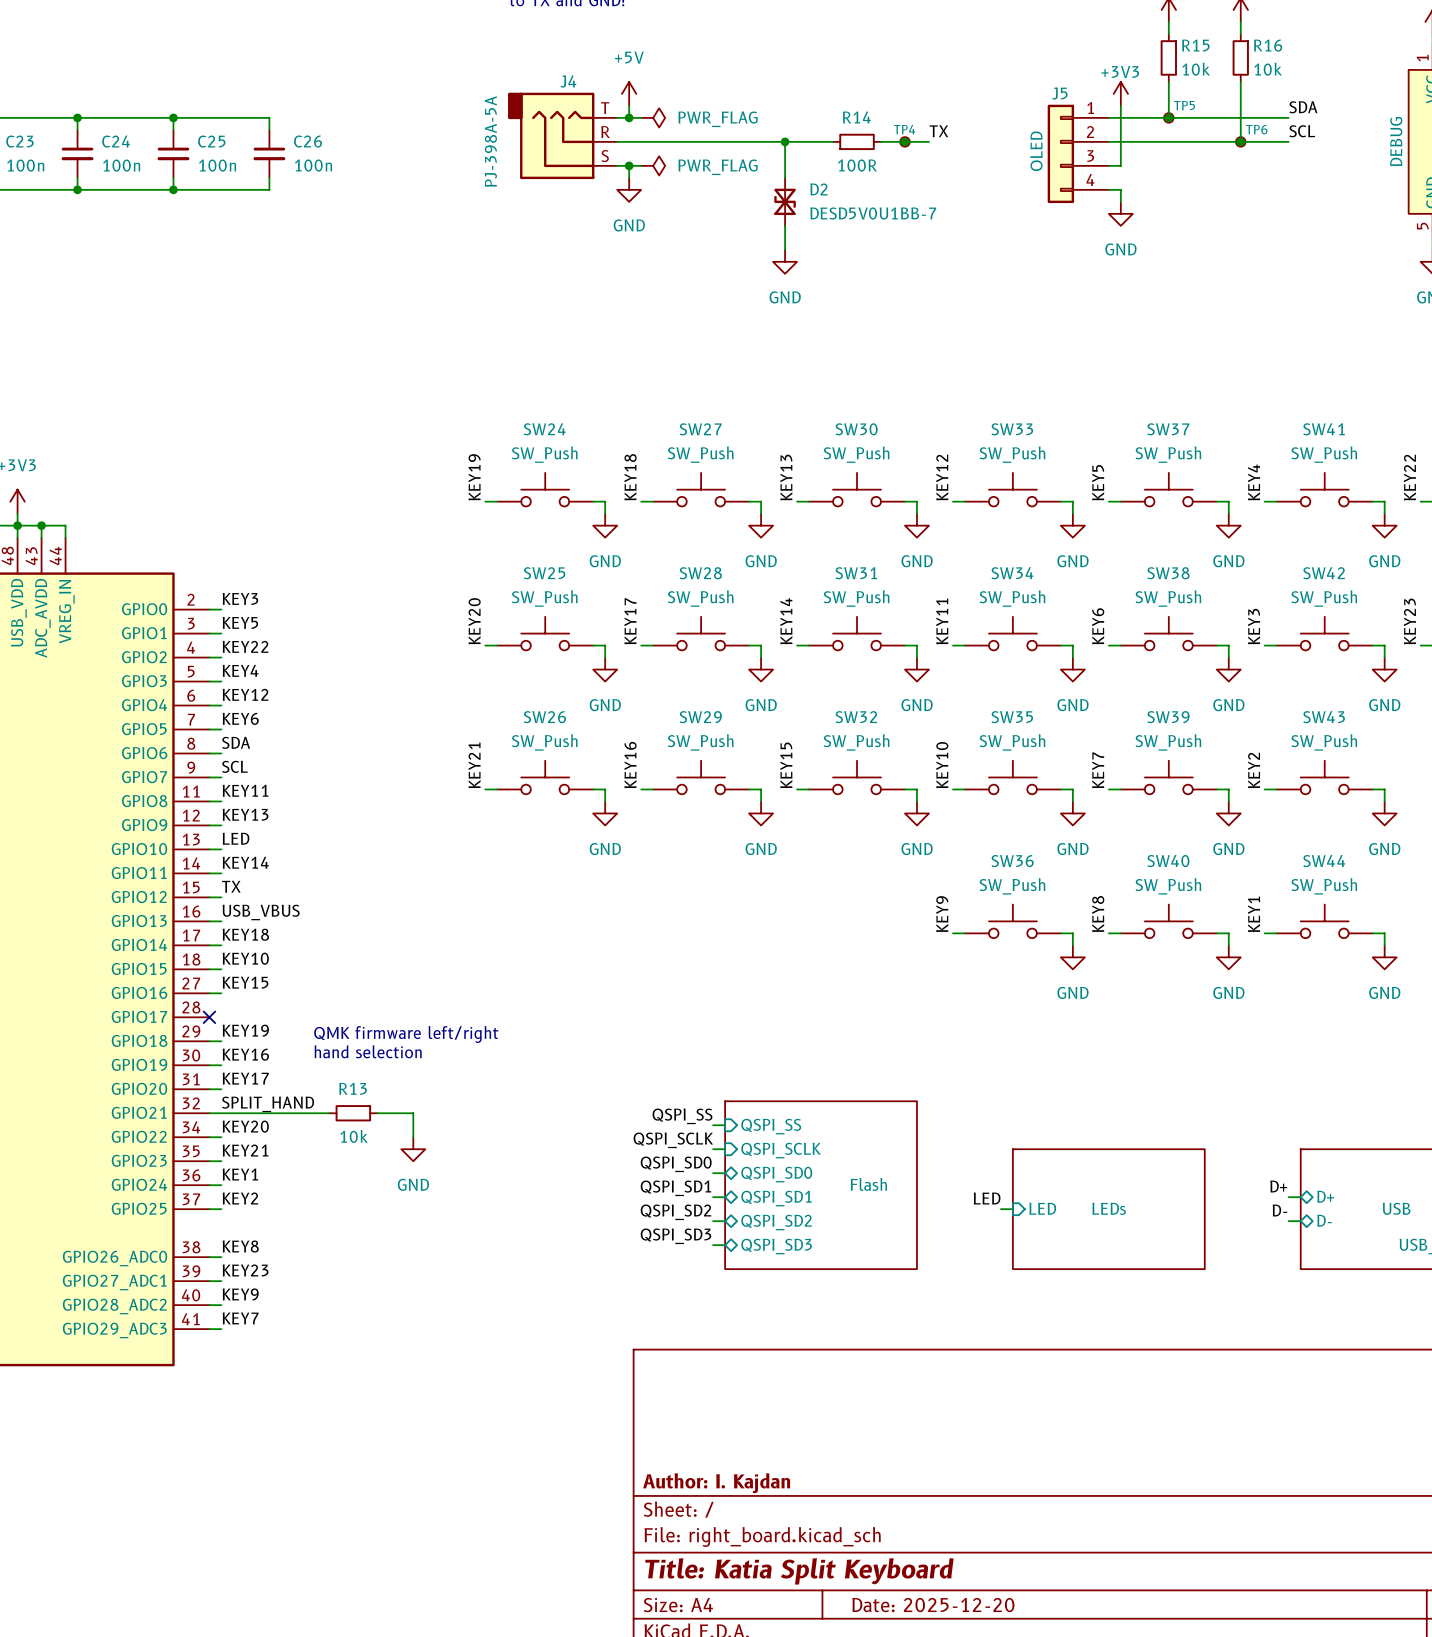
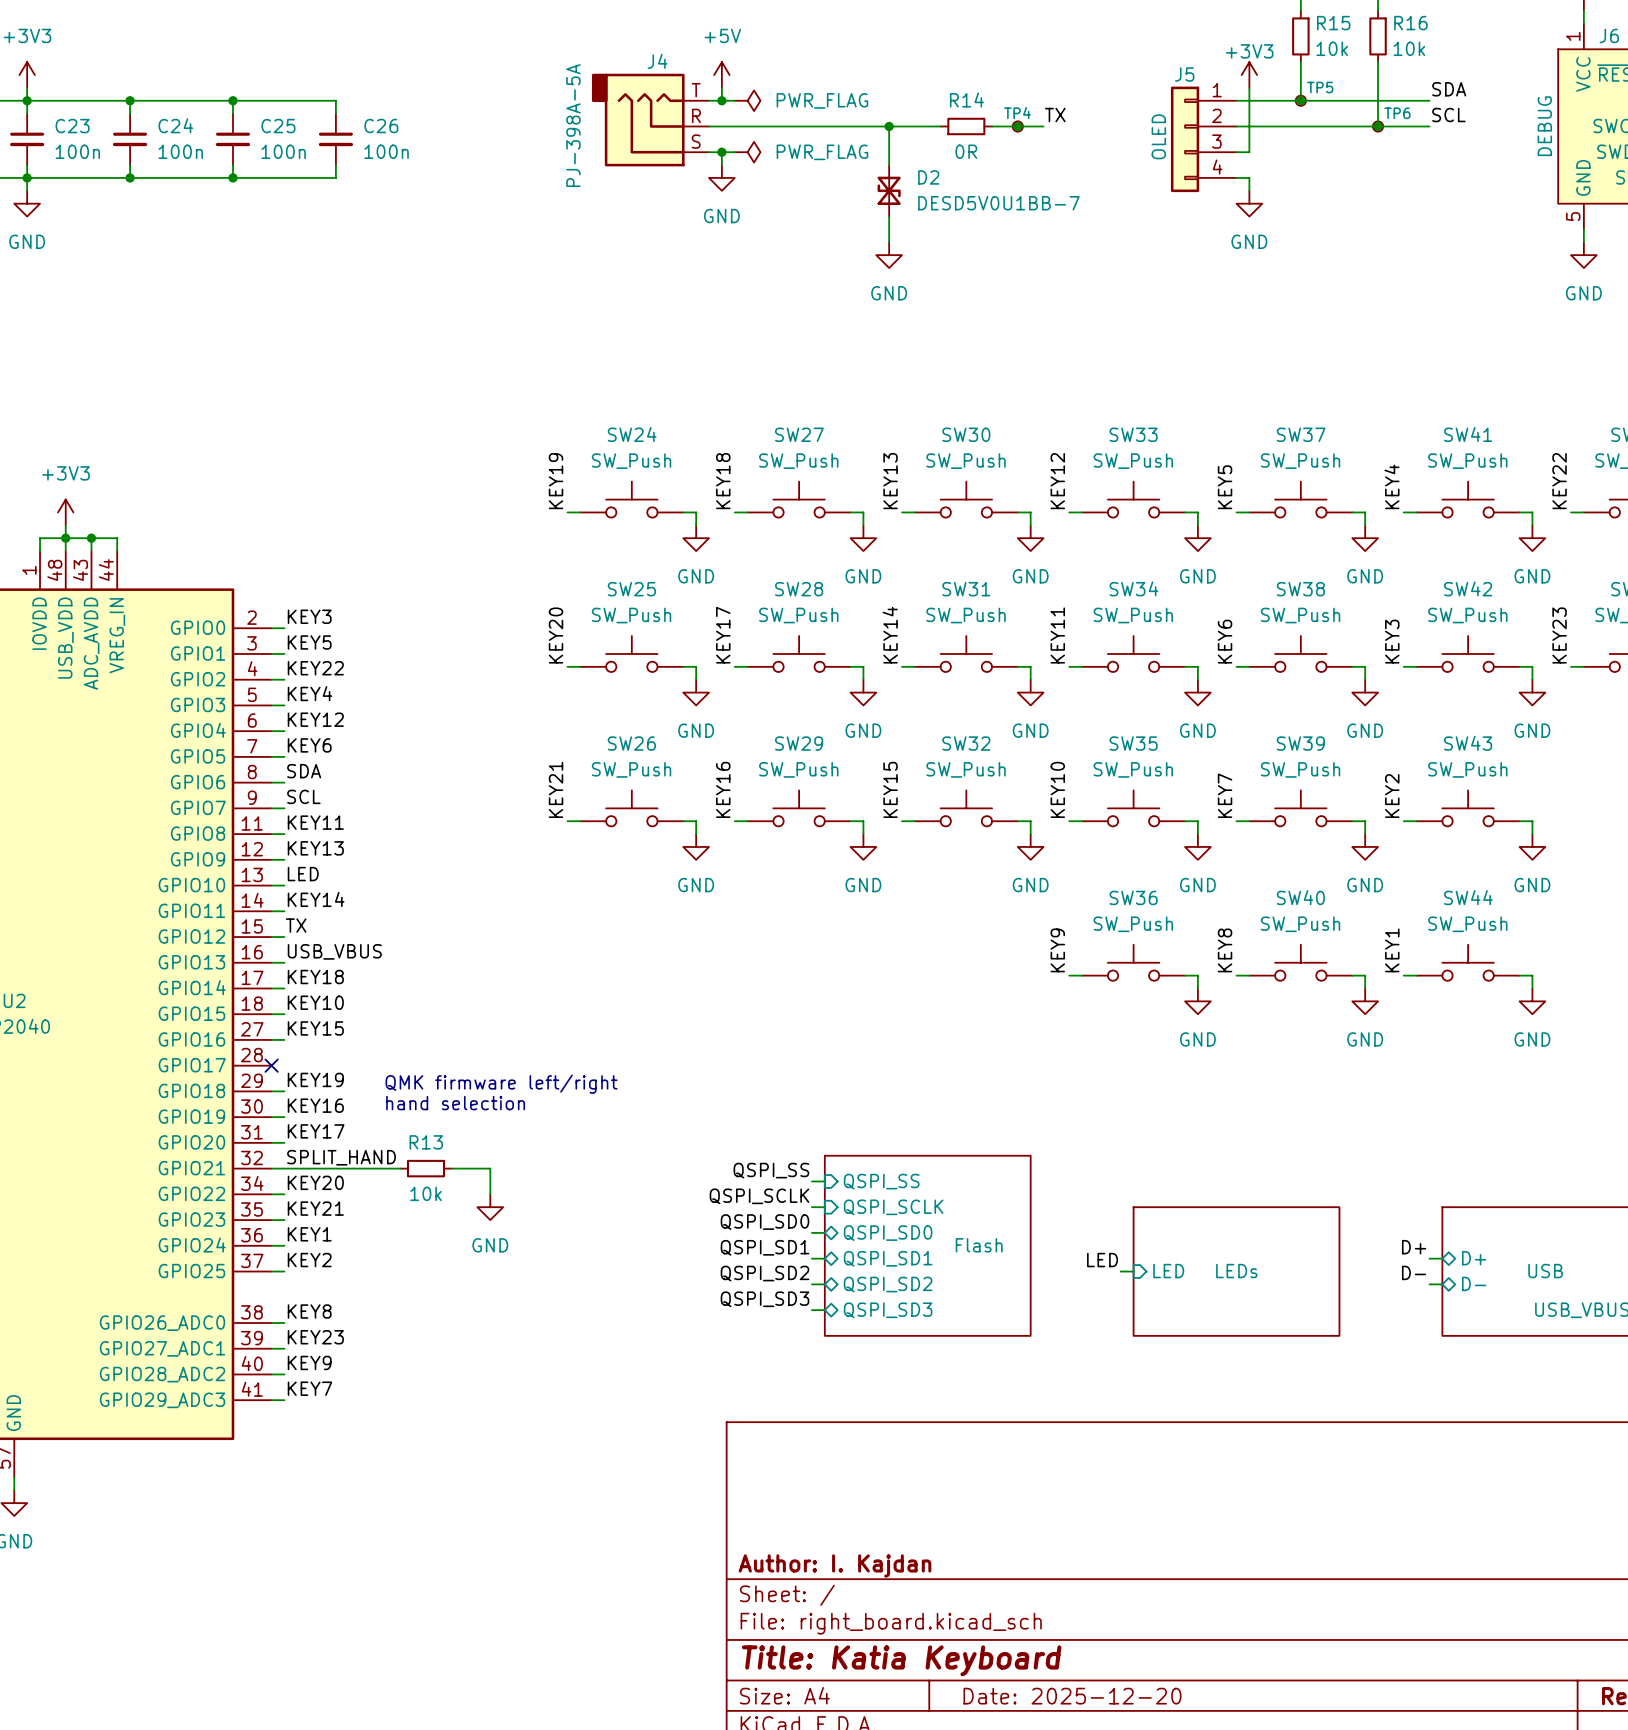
R14 value: 100R (857, 165) -> 0R (966, 151)
title block: Title: Katia Split Keyboard (799, 1571) -> Title: Katia Keyboard (901, 1660)

